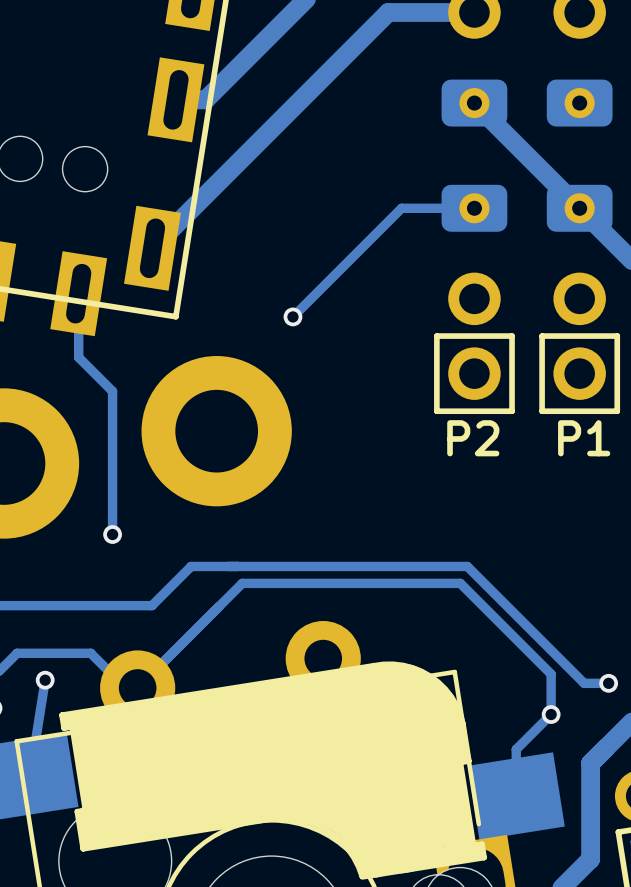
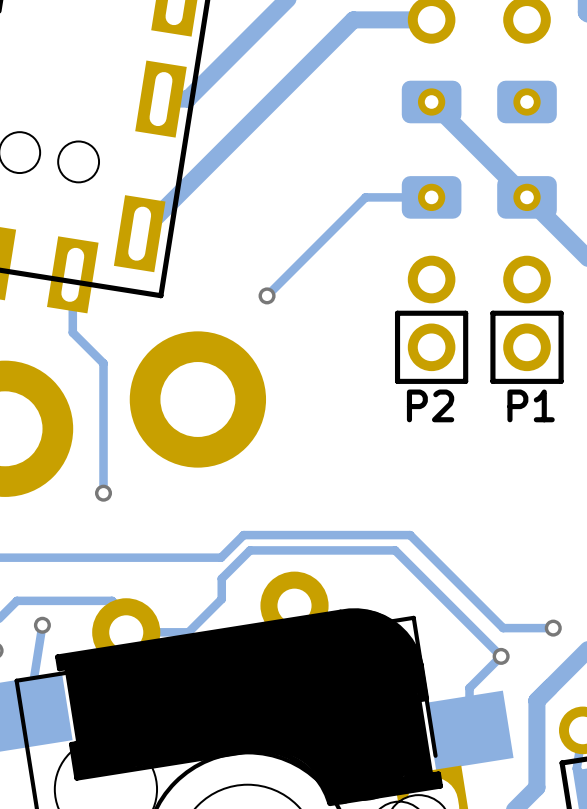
track: (151, 605) (191, 566) (467, 566) (584, 683) -> (139, 557) (221, 557) (243, 535) (410, 535) (503, 628) (531, 628)
track: (90, 653) (125, 687) (137, 687) (242, 583) (460, 583) (551, 674) (551, 714) -> (83, 600) (112, 600) (126, 615) (126, 632) (188, 632) (221, 599) (221, 578) (250, 550) (395, 550) (501, 656)

